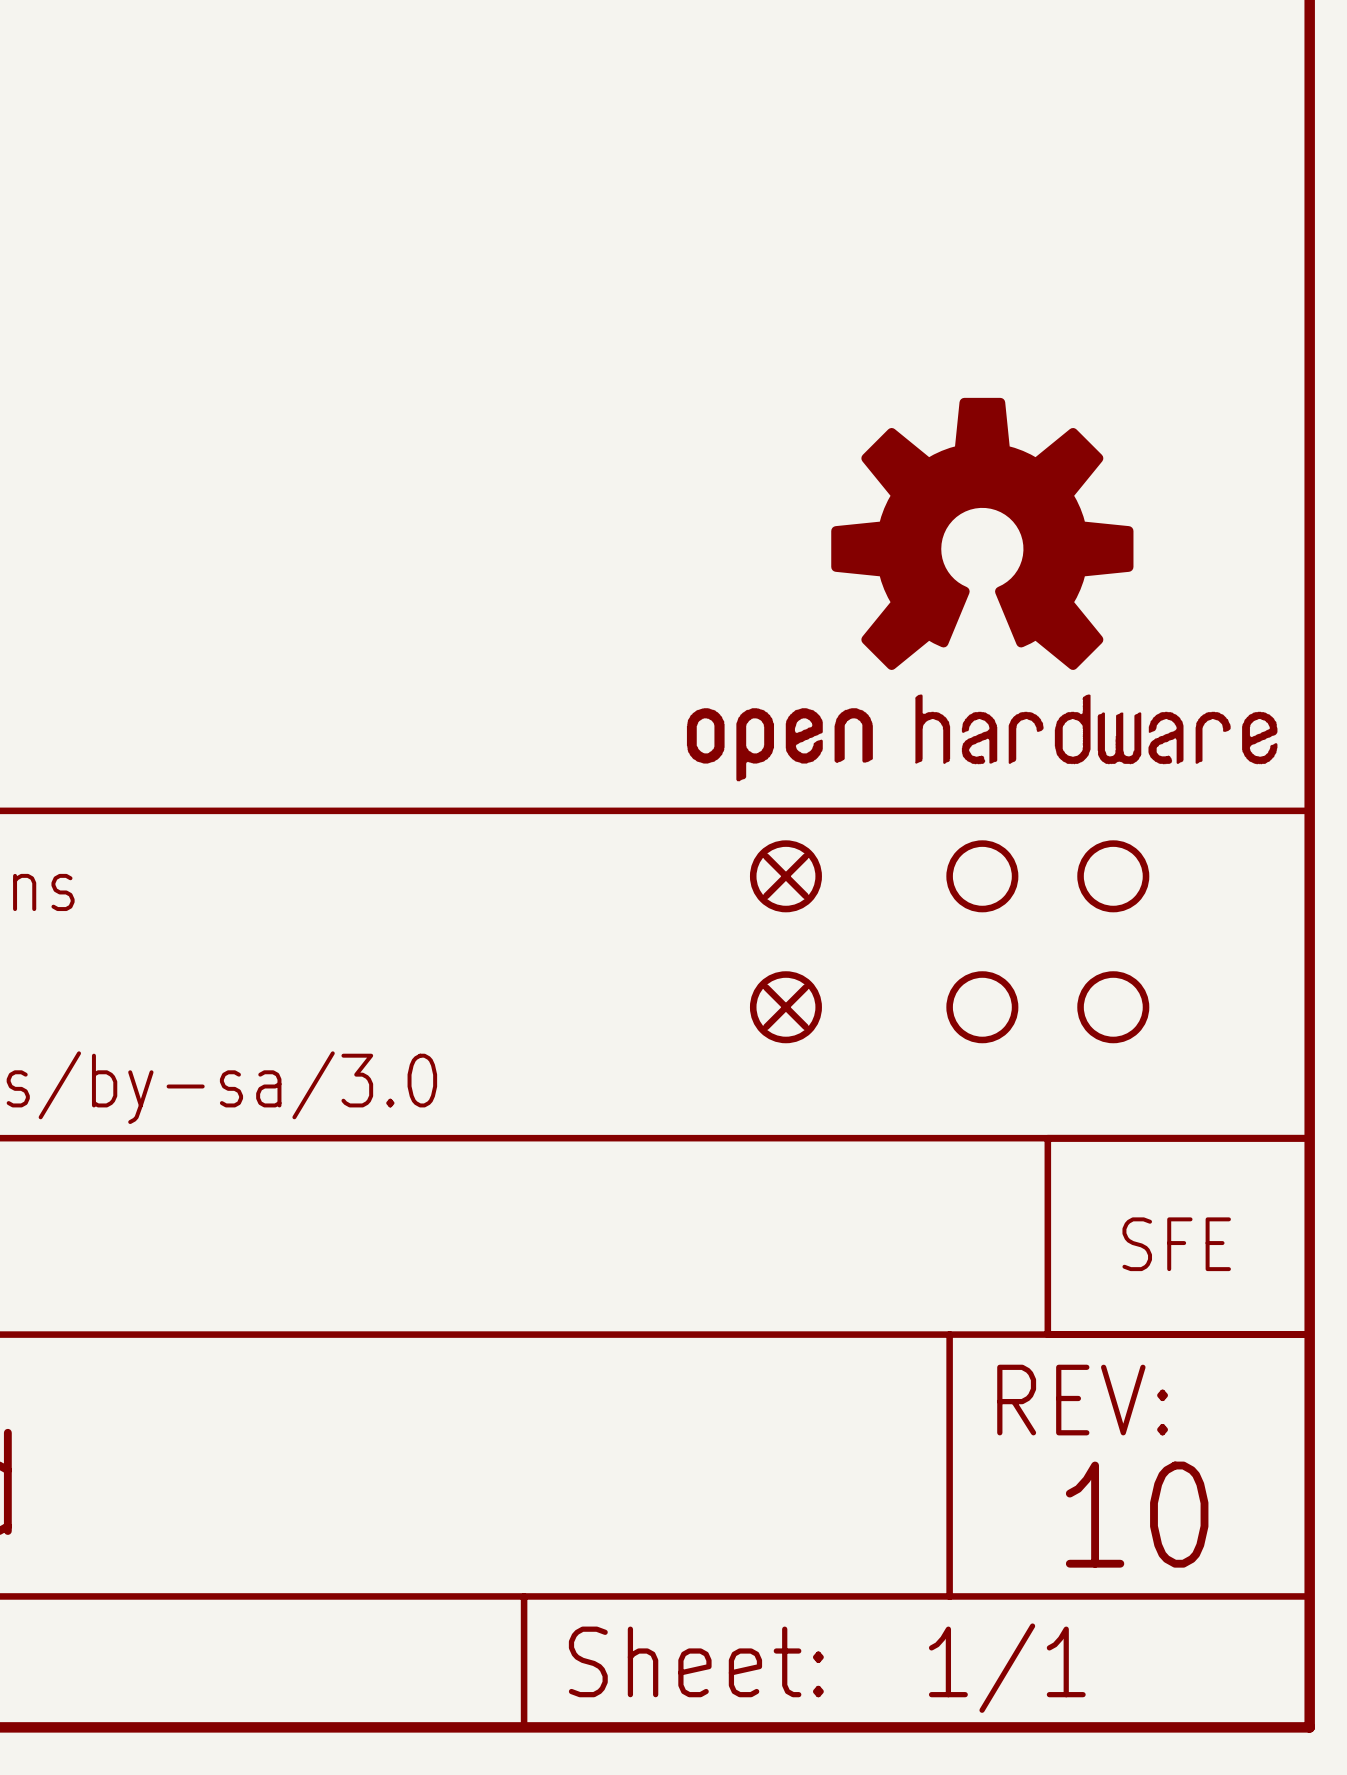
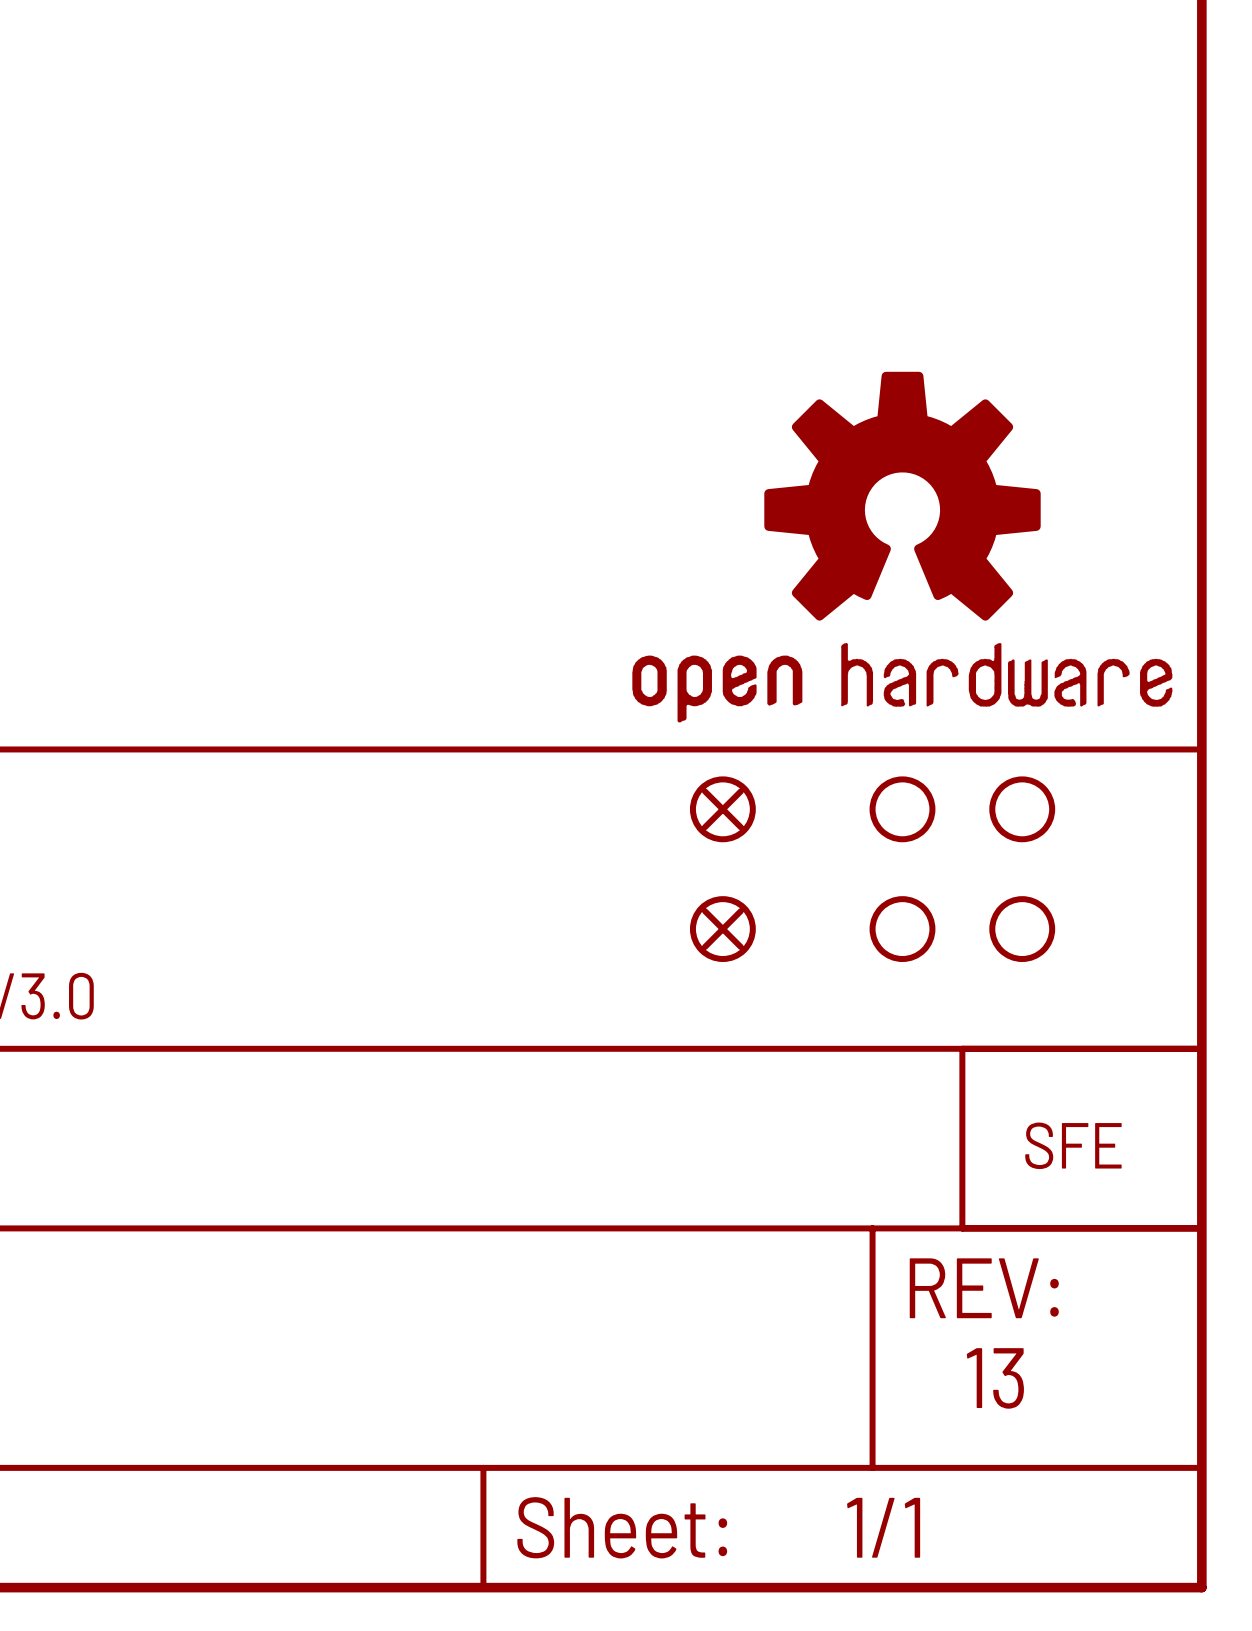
text: none -> 13 (995, 1378)
text: 10 (1137, 1514) -> none

